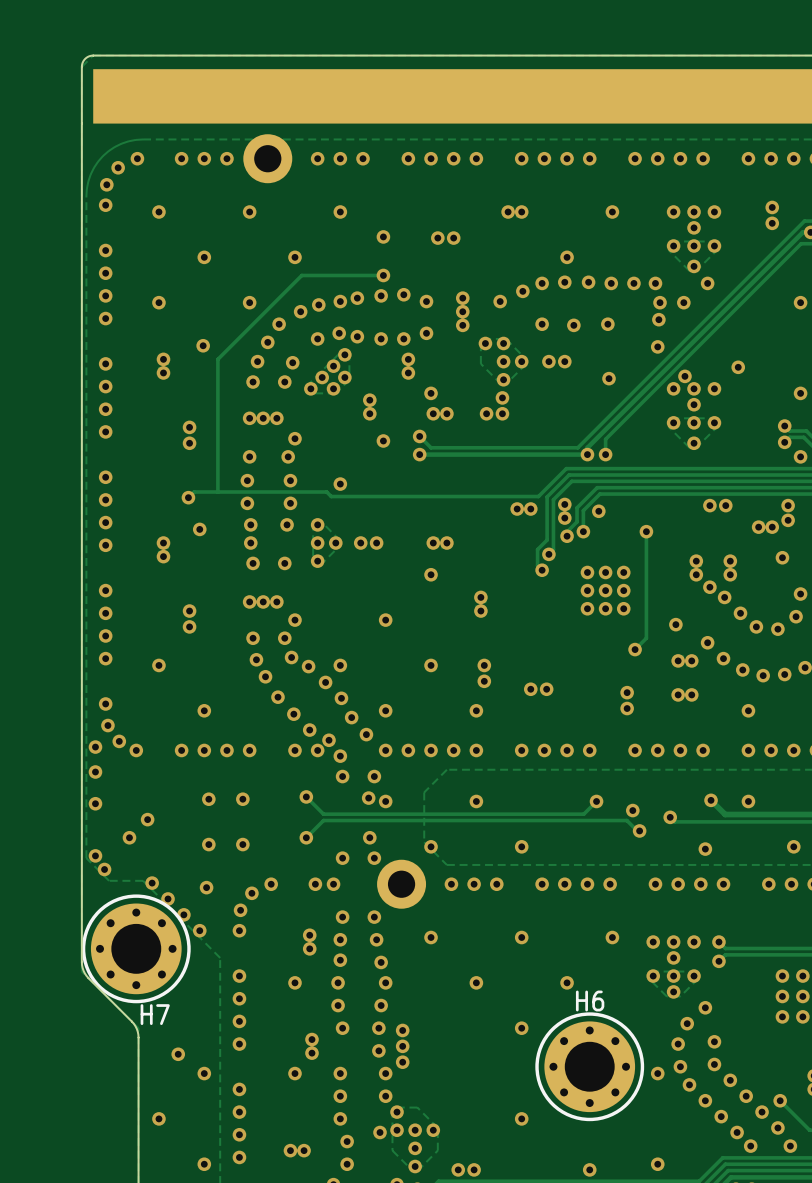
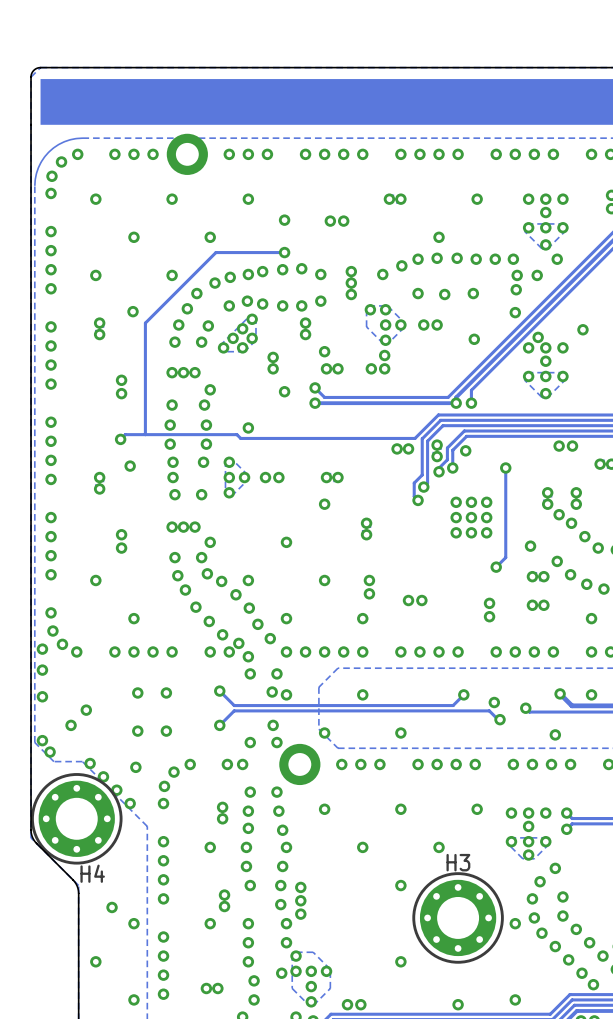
H6 name: H6 (590, 1001) -> H3 (458, 862)
H7 name: H7 (155, 1014) -> H4 (92, 873)

